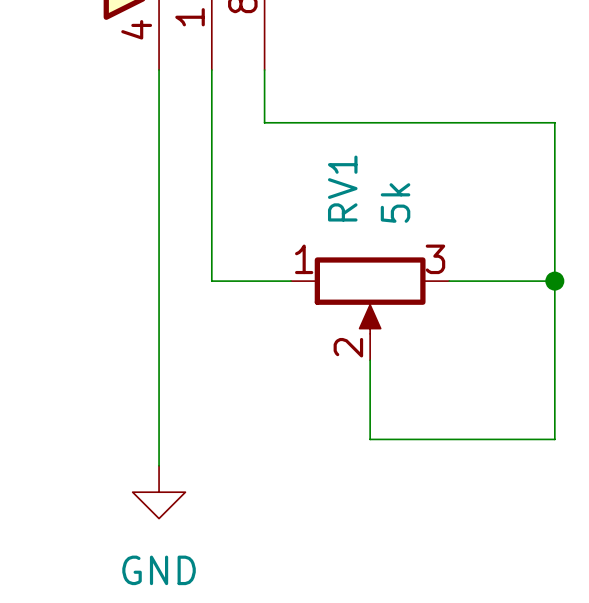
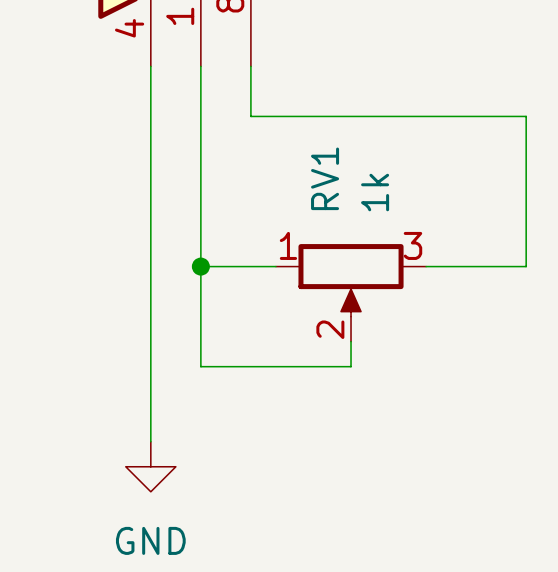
RV1 value: 5k (395, 203) -> 1k (375, 192)
junction: none -> (200, 266)
wire: (554, 281) (554, 439) (370, 439) (370, 386) -> (200, 266) (200, 366) (351, 366)
junction: (554, 281) -> none

